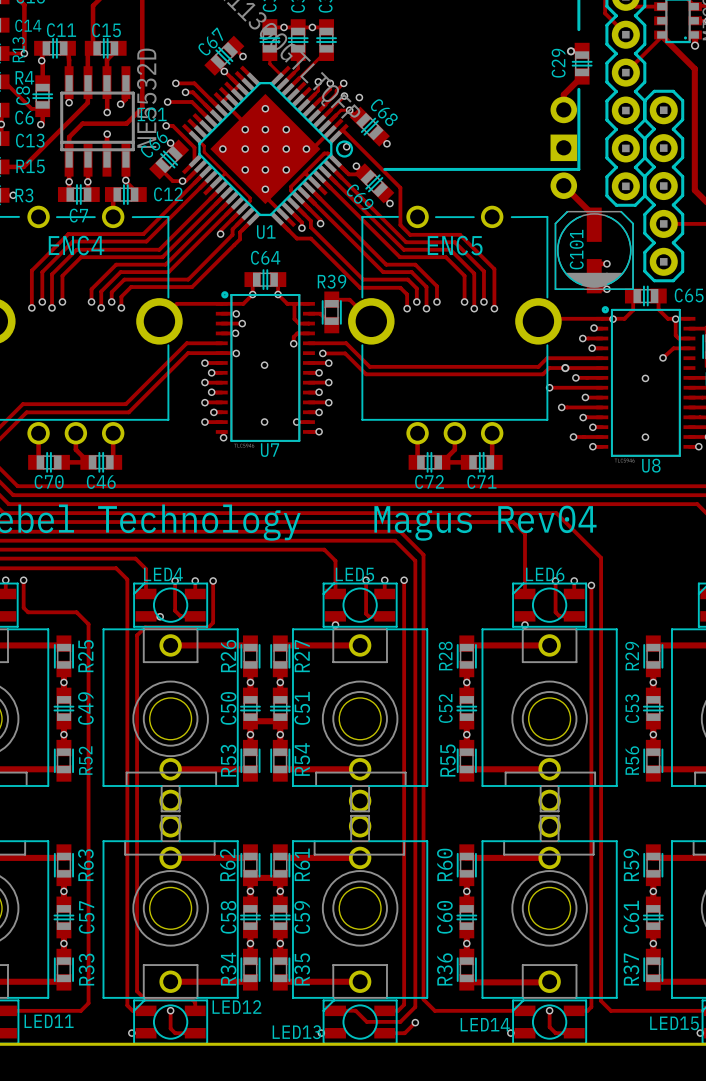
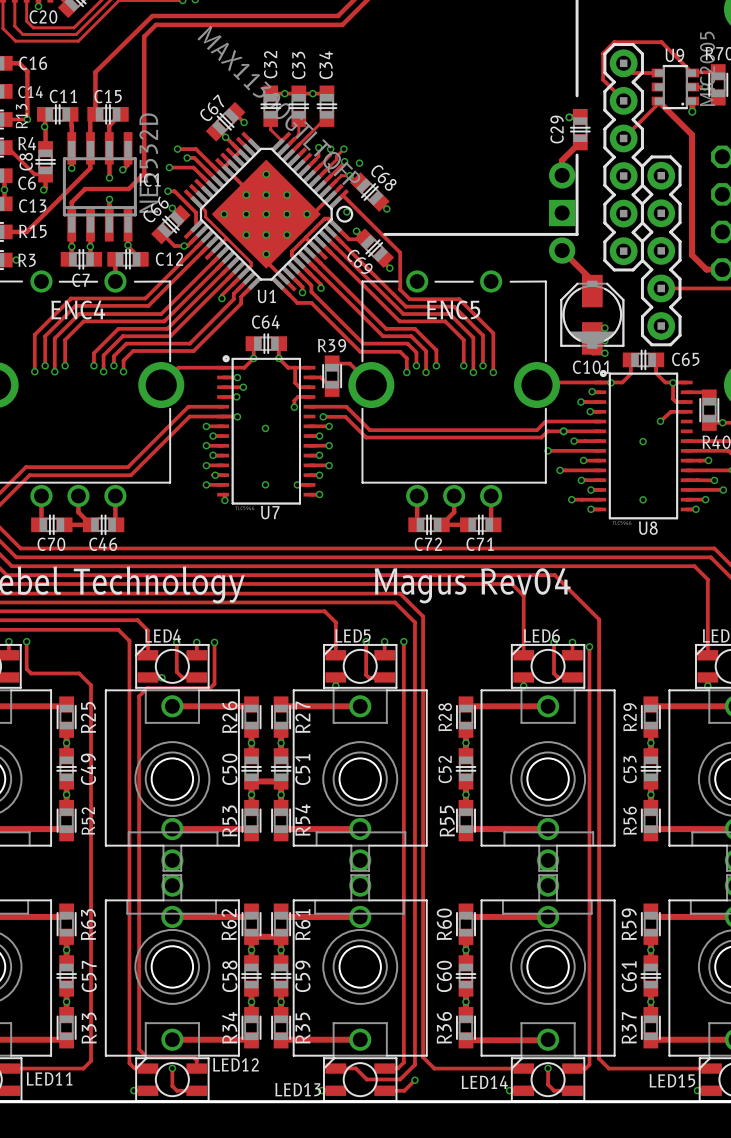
C101 footprint: [554, 207, 634, 294] -> [560, 274, 625, 355]
C101 name rotation: 0° (576, 249) -> 90° clockwise (591, 367)
C101 name position: C101 (576, 249) -> C101 (591, 367)

